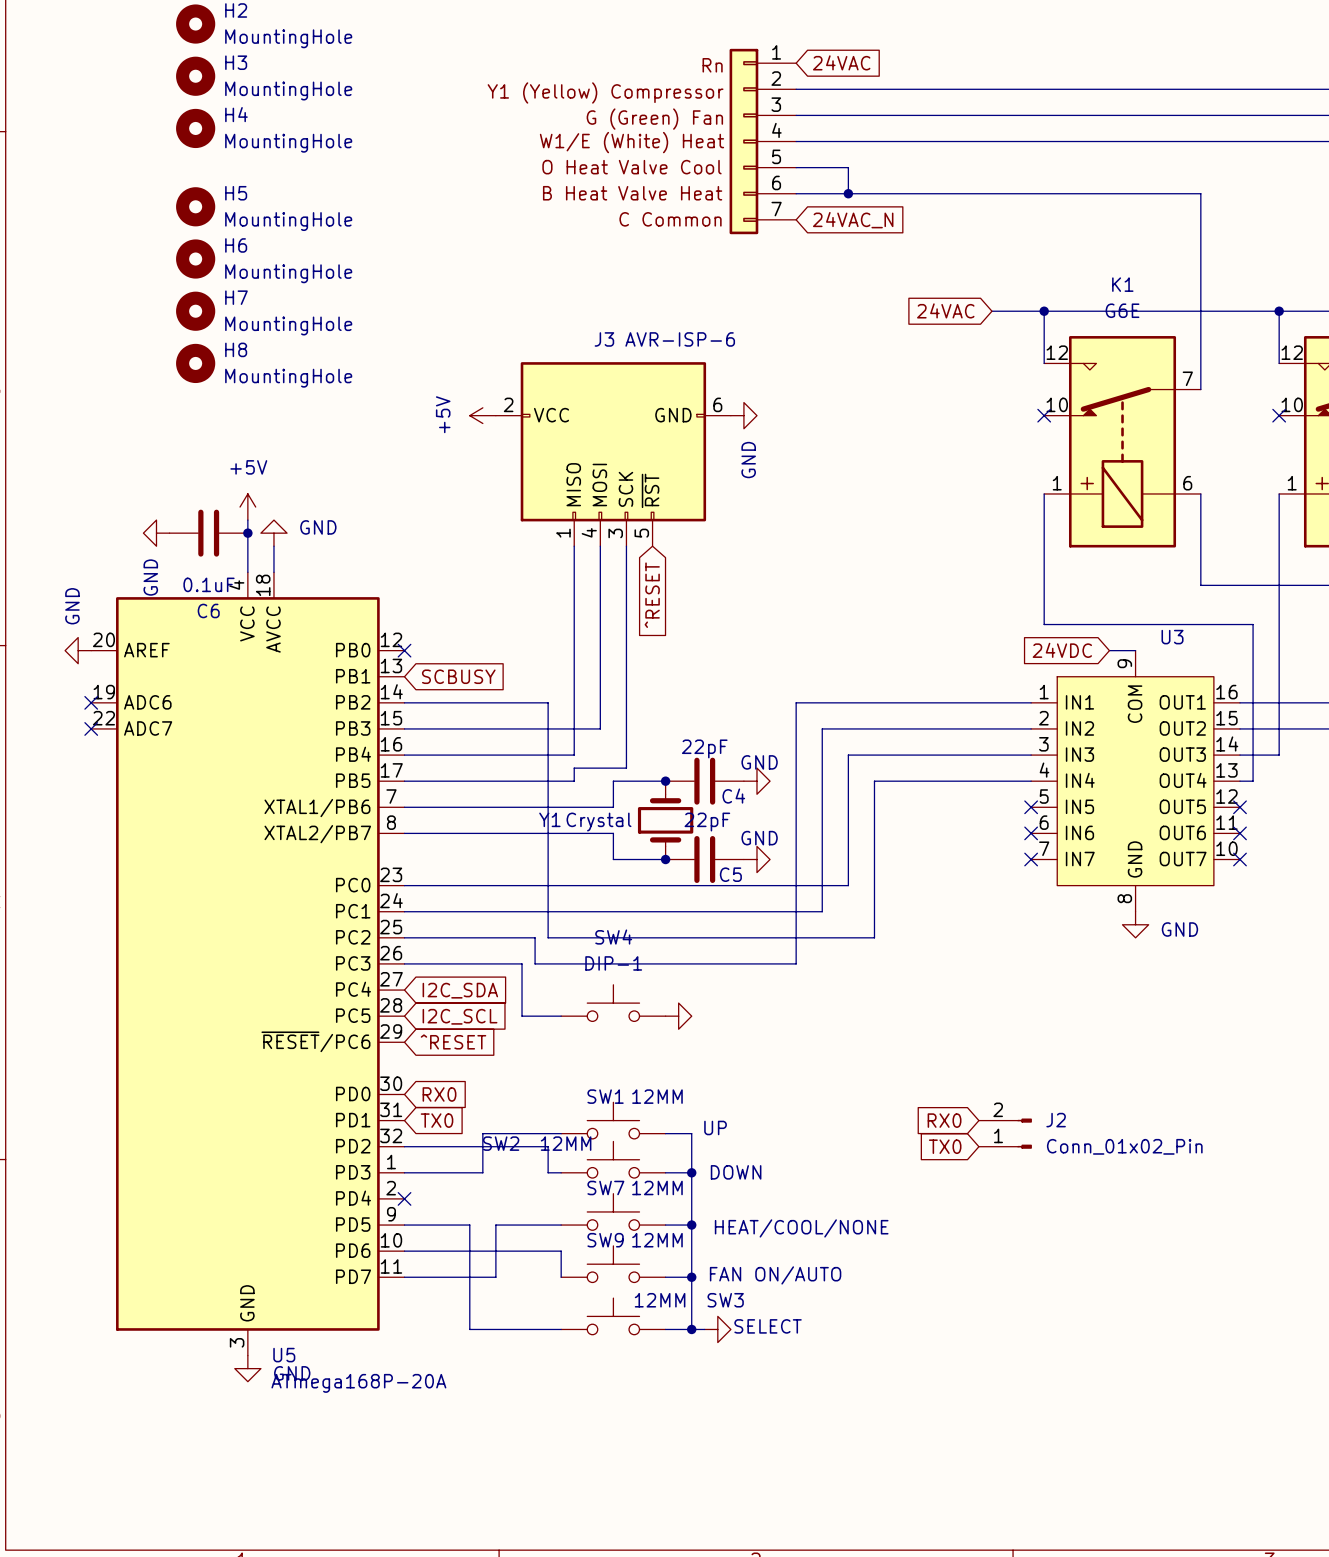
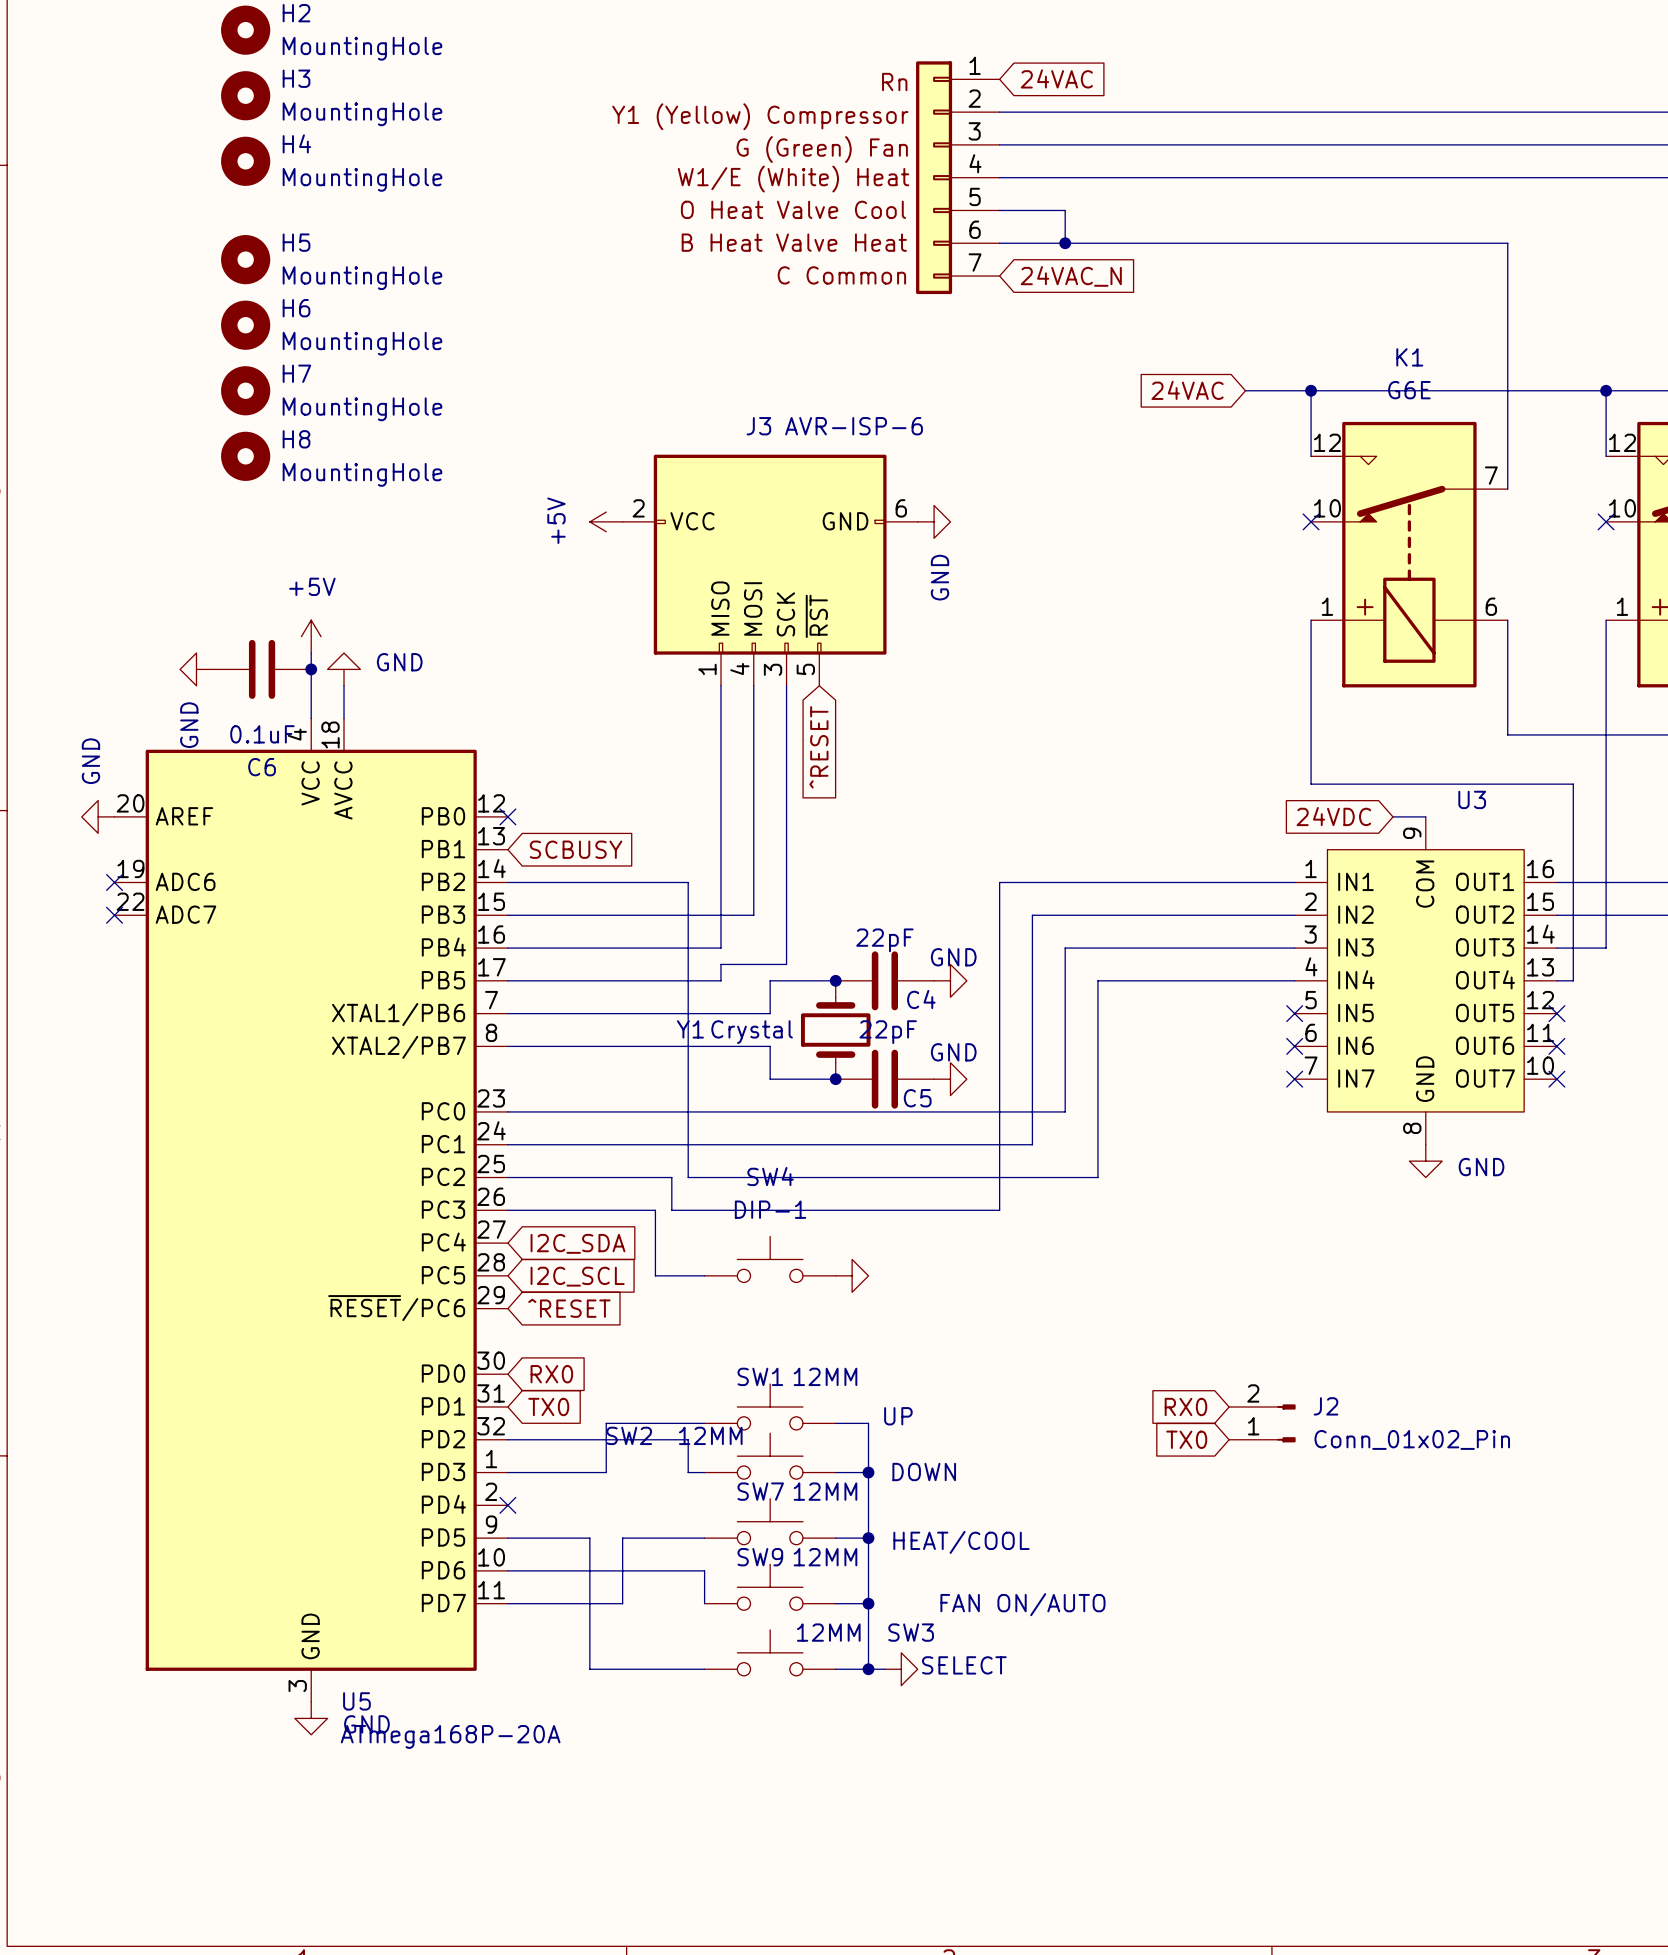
text: HEAT/COOL/NONE (801, 1228) -> HEAT/COOL (961, 1542)
text position: FAN ON/AUTO (775, 1275) -> FAN ON/AUTO (1022, 1604)

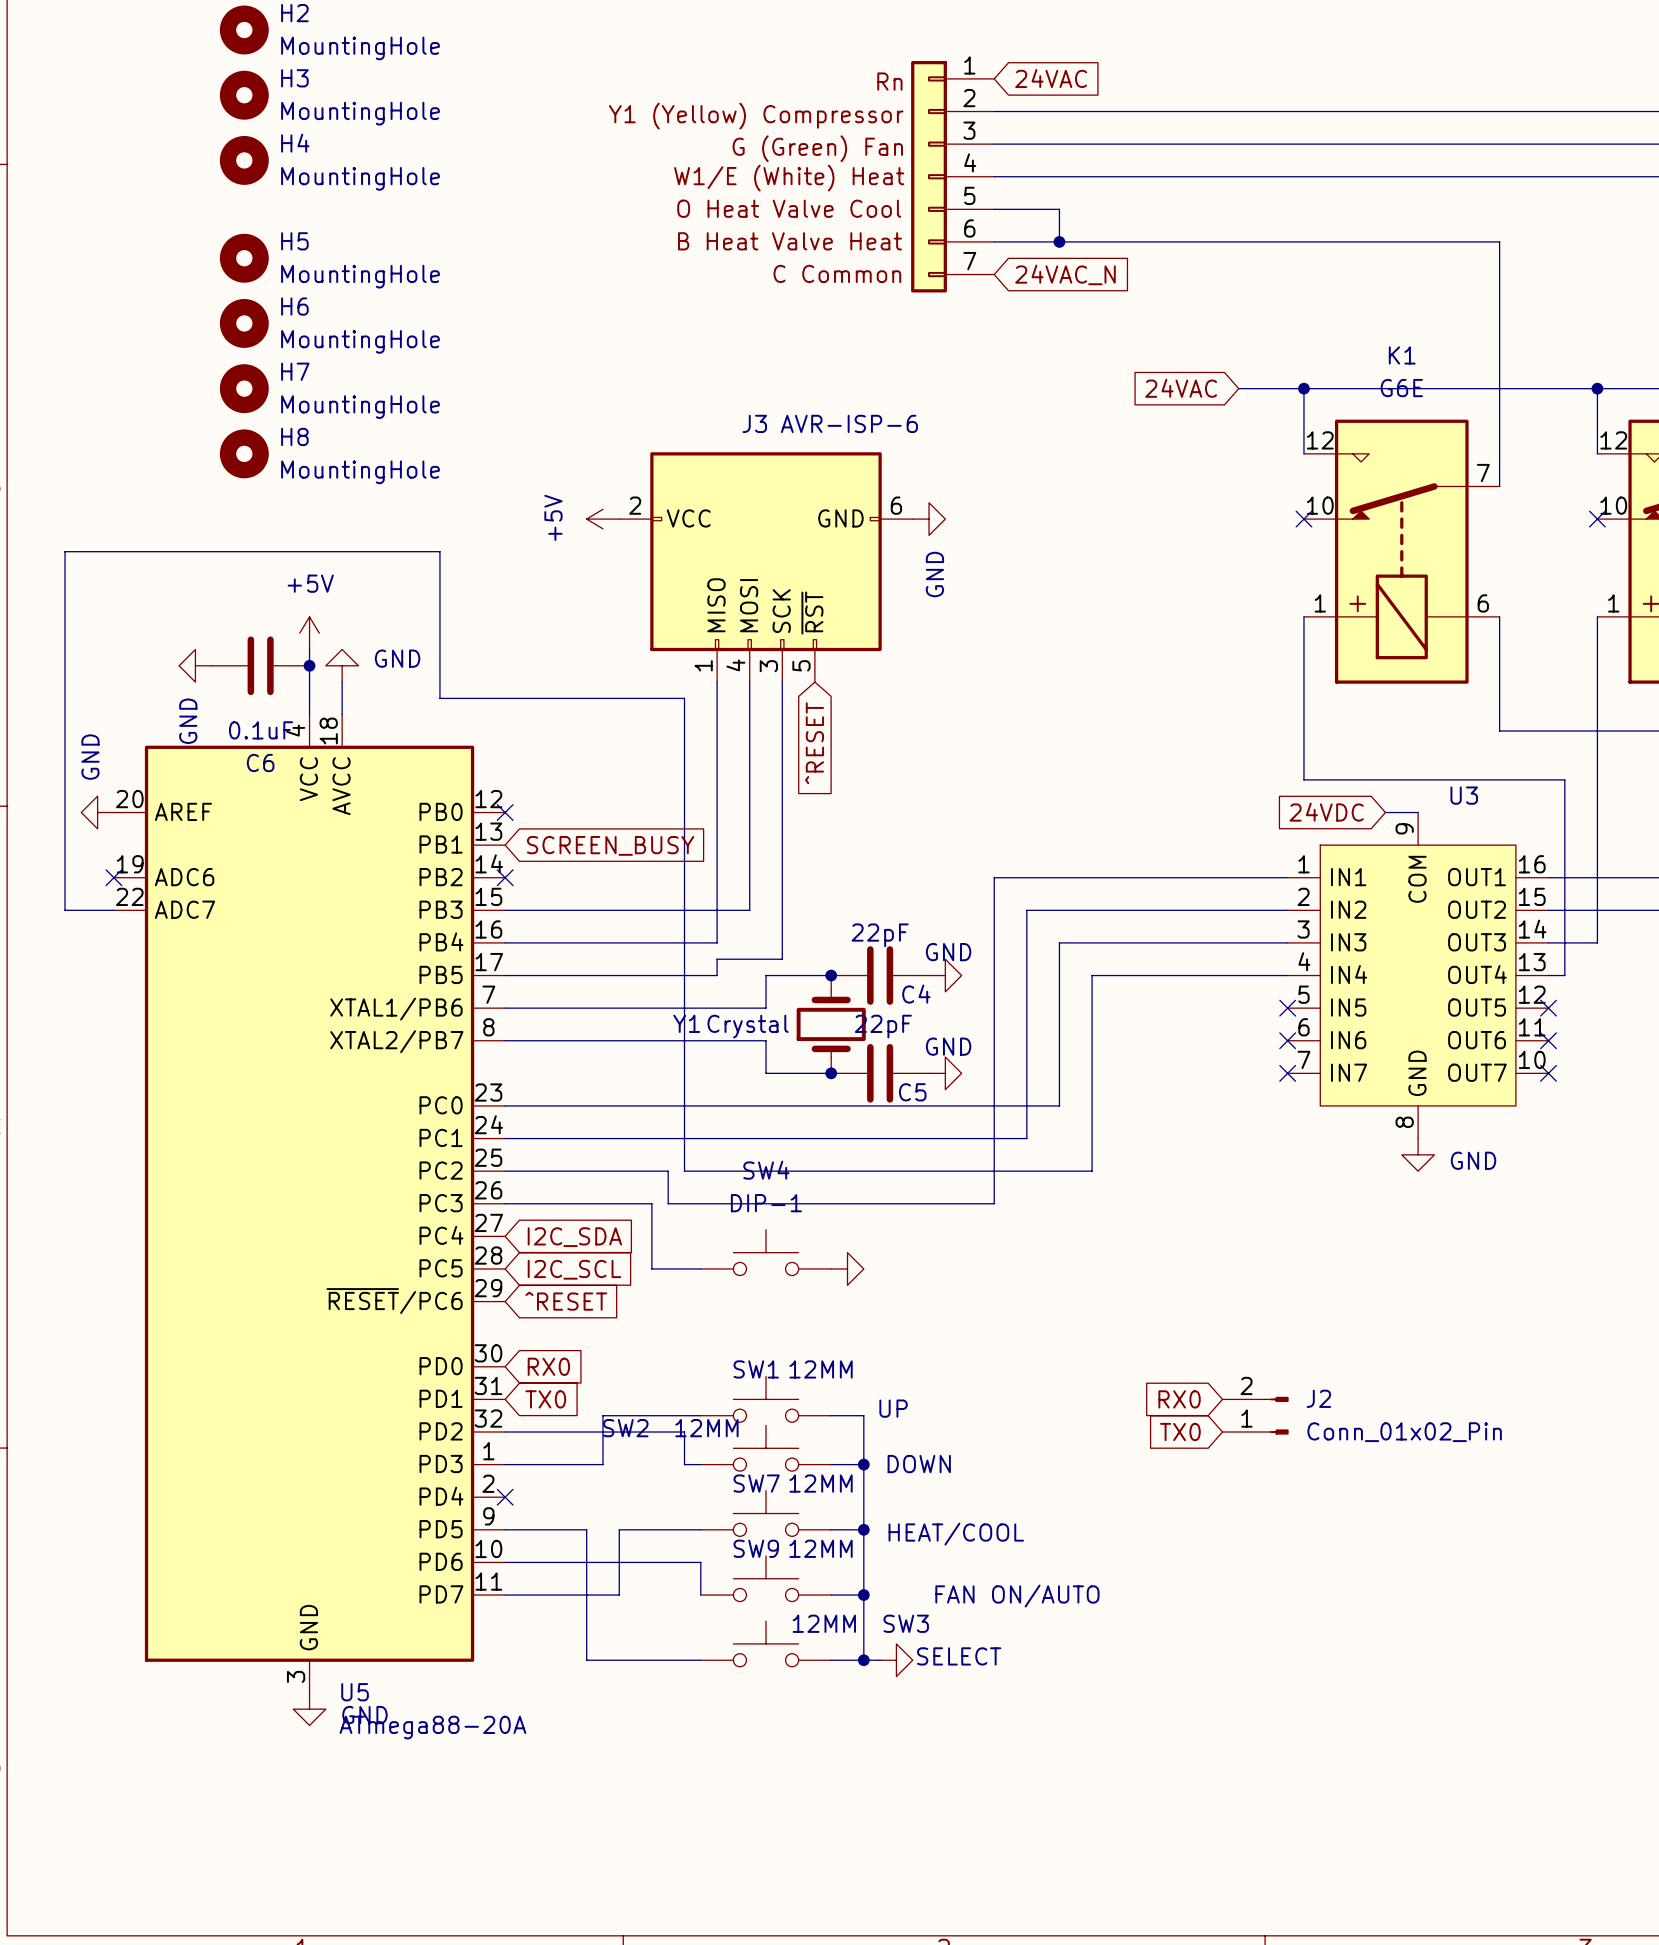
global label: SCBUSY (576, 849) -> SCREEN_BUSY (610, 845)
wire: (507, 882) (688, 882) -> (113, 910) (65, 910) (65, 551) (439, 551) (439, 698) (684, 698) (684, 877)
no-connect mark: none -> (505, 877)
no-connect mark: (114, 915) -> none
U5 value: ATmega168P-20A (450, 1736) -> ATmega88-20A (432, 1727)

